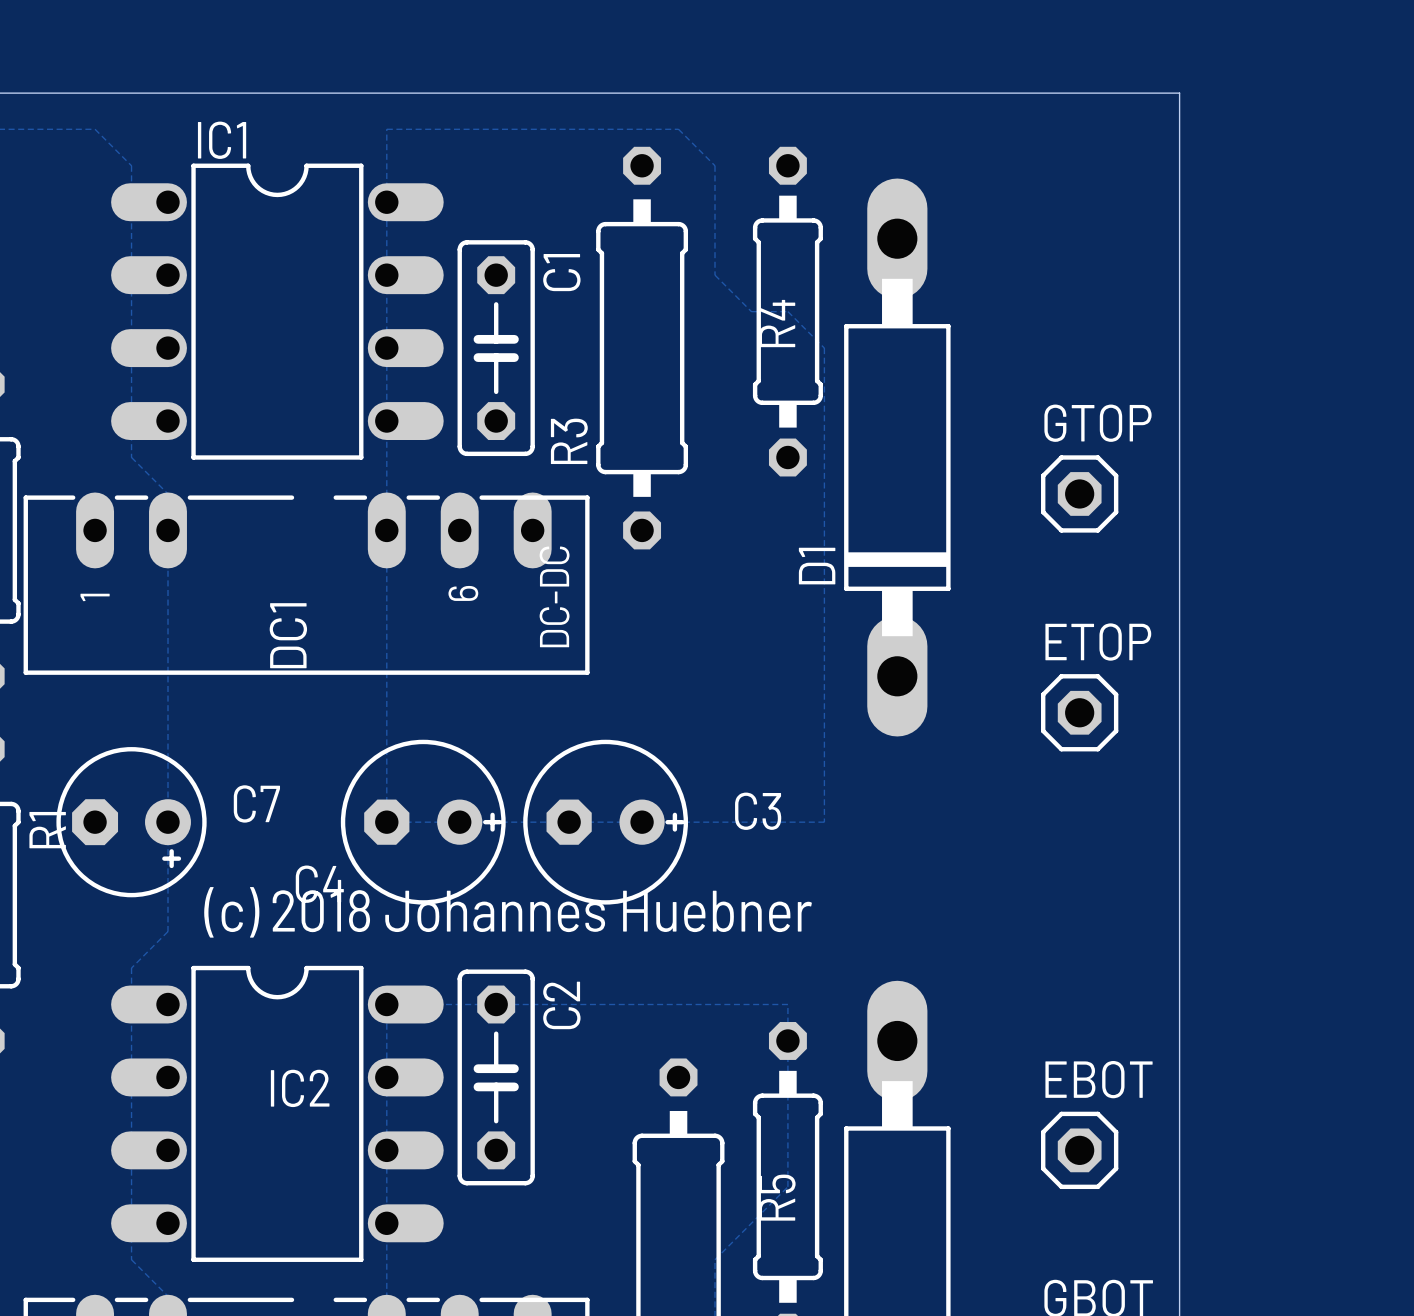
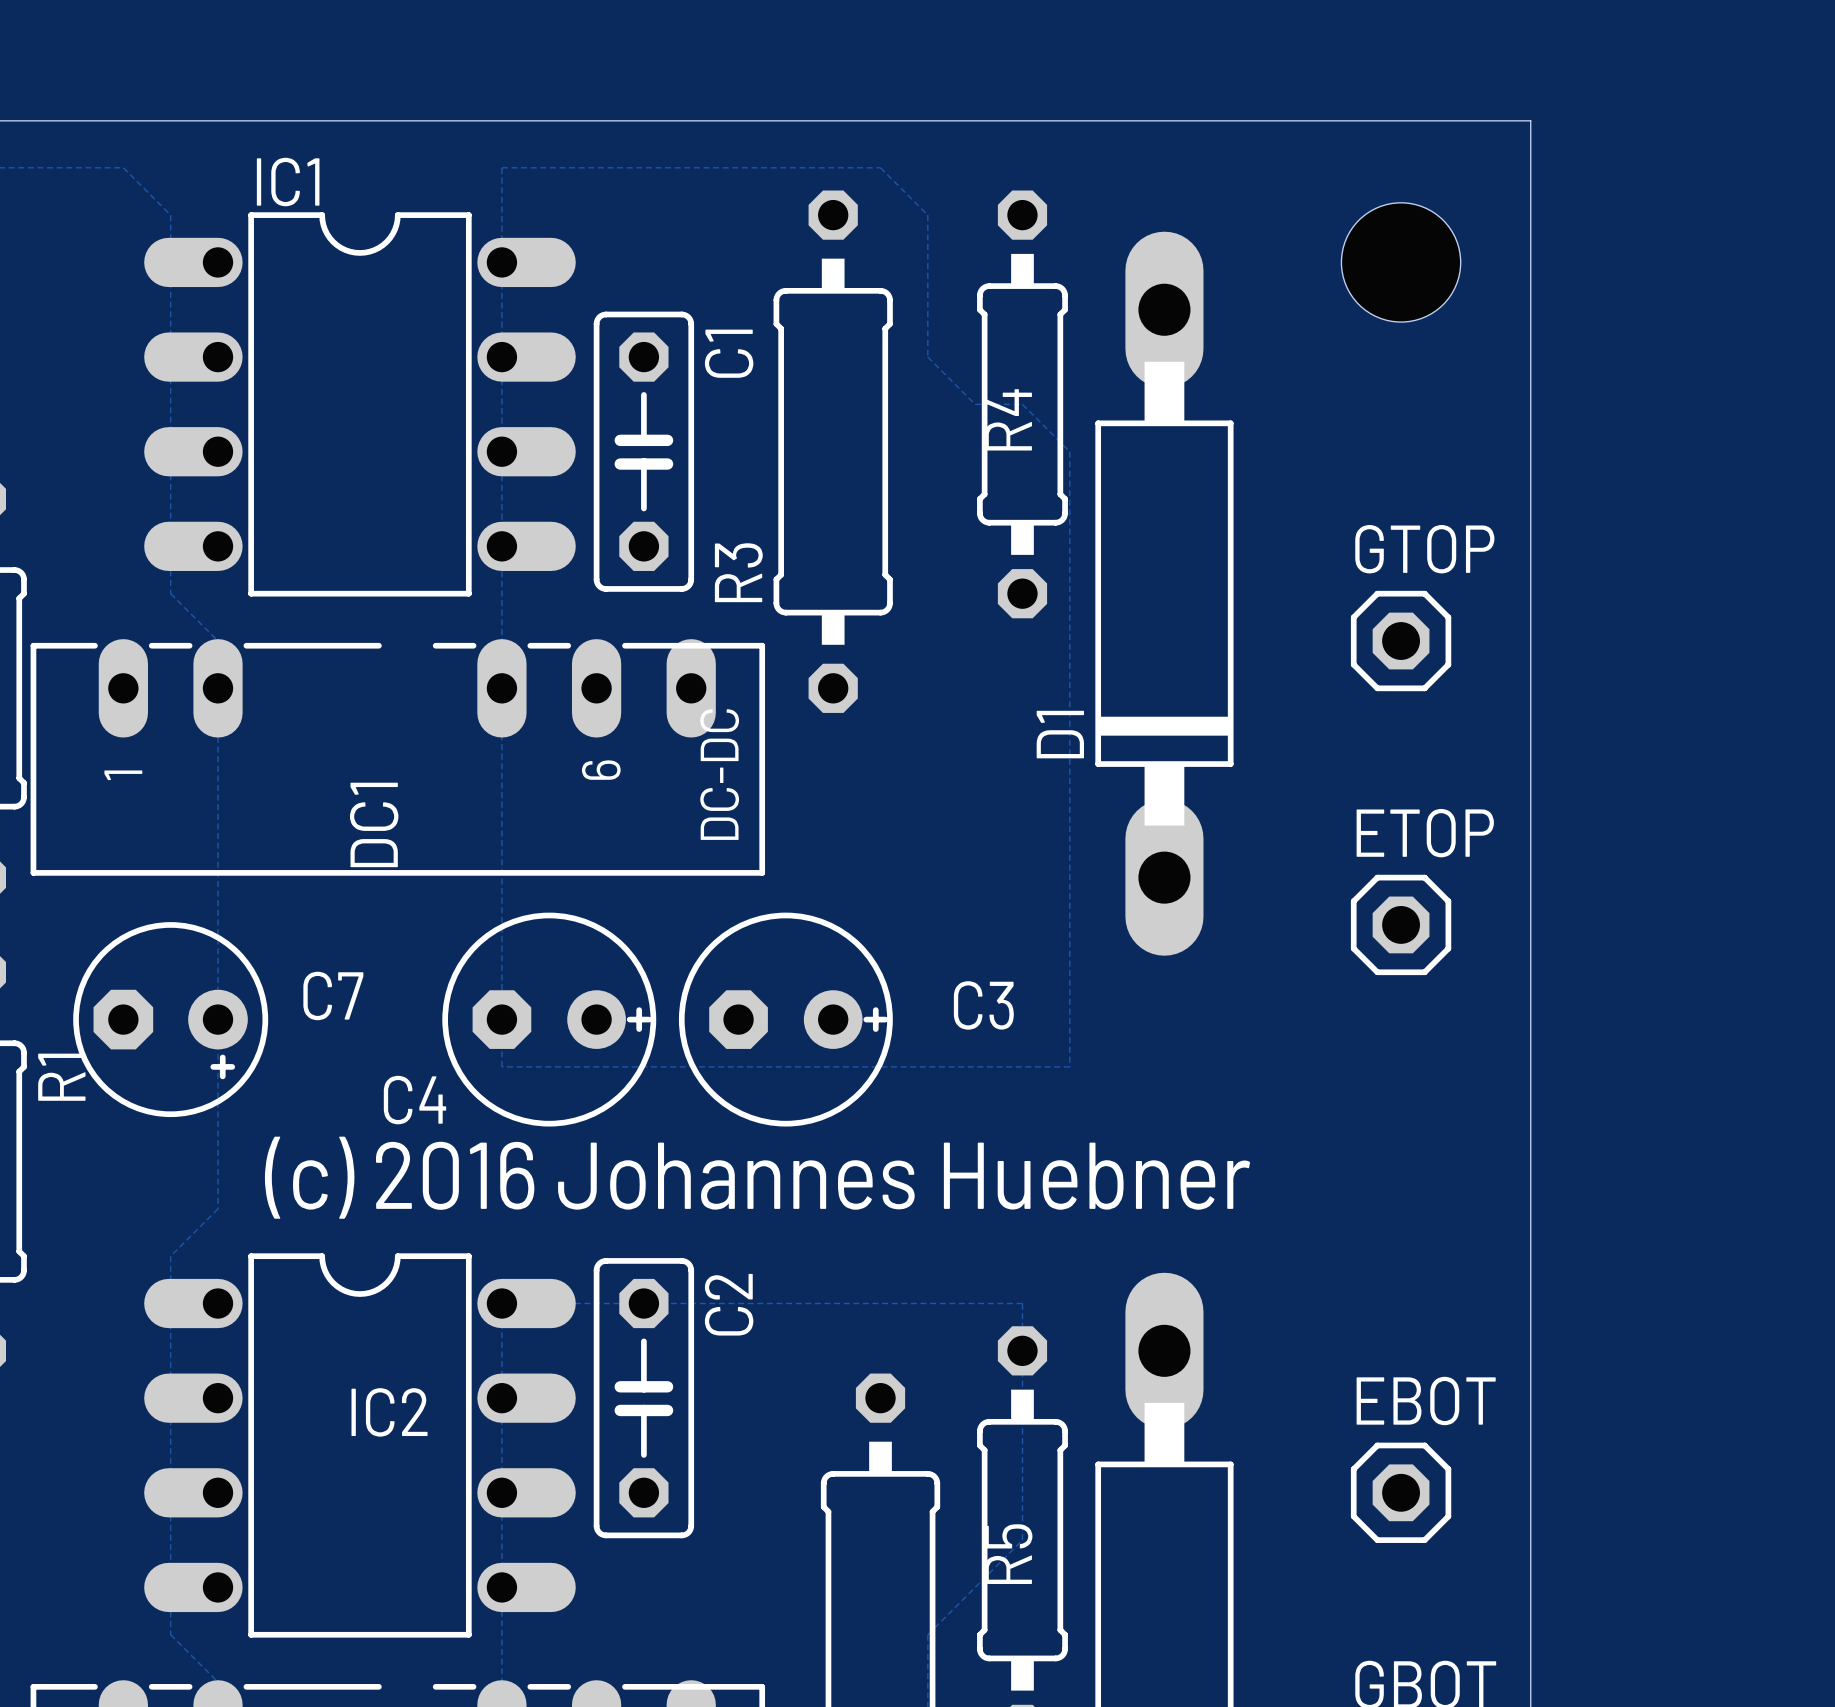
hole: none -> (1401, 262)
C7 position: (131, 822) -> (170, 1019)
C4 position: (423, 822) -> (549, 1019)
C3 position: (605, 822) -> (785, 1019)
text: (c) 2018 Johannes Huebner (508, 912) -> (c) 2016 Johannes Huebner (757, 1177)

